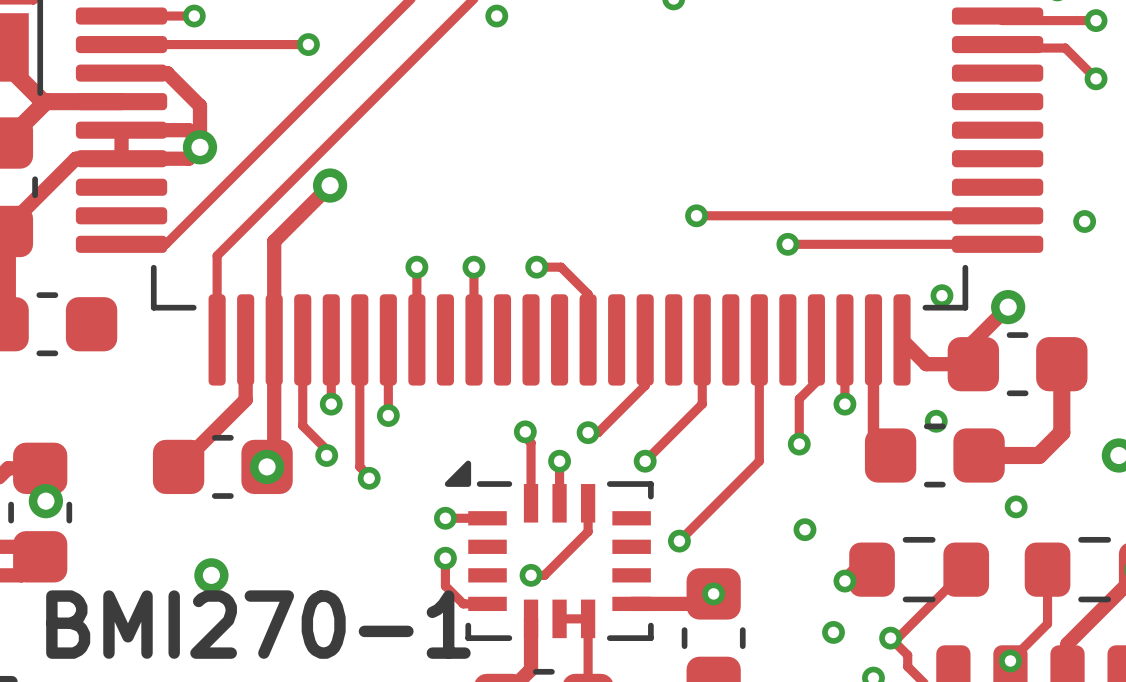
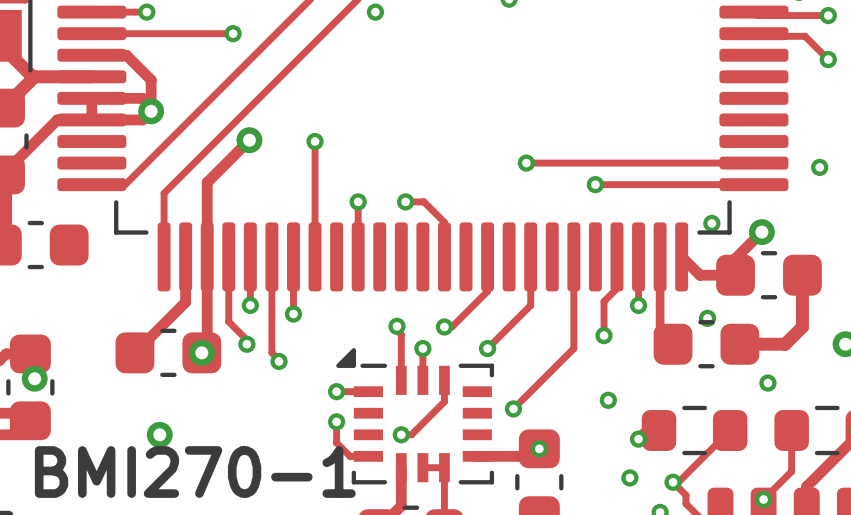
track: none -> (315, 141) (315, 201)
via position: (416, 267) -> (315, 141)

